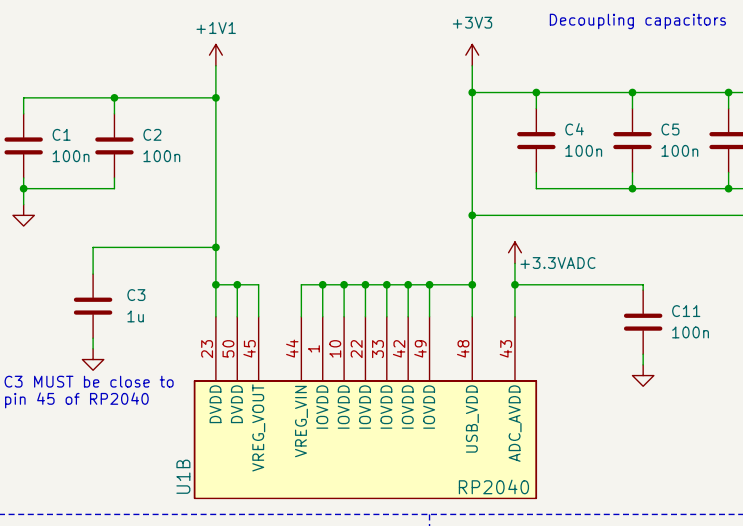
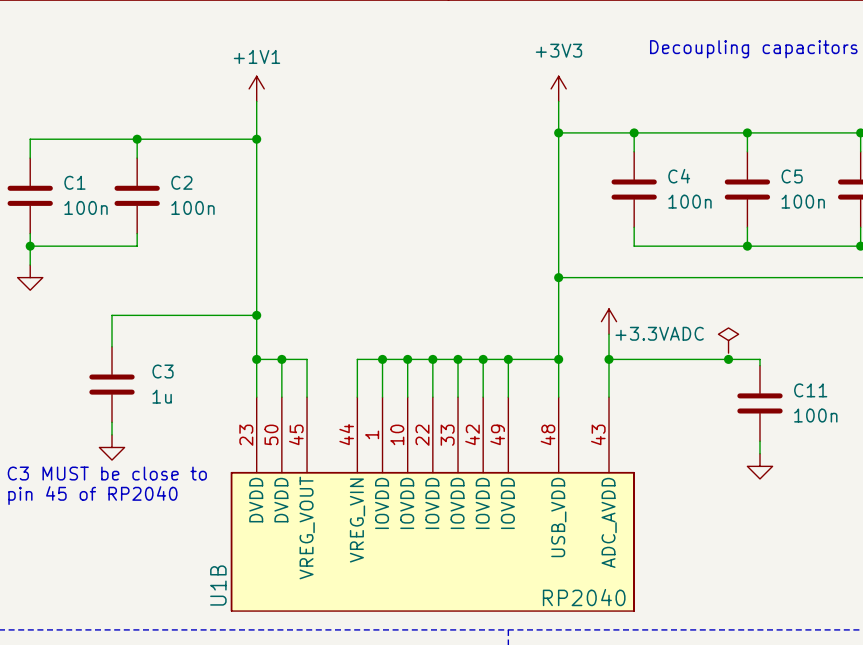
power symbol: none -> (728, 340)
junction: none -> (728, 359)

